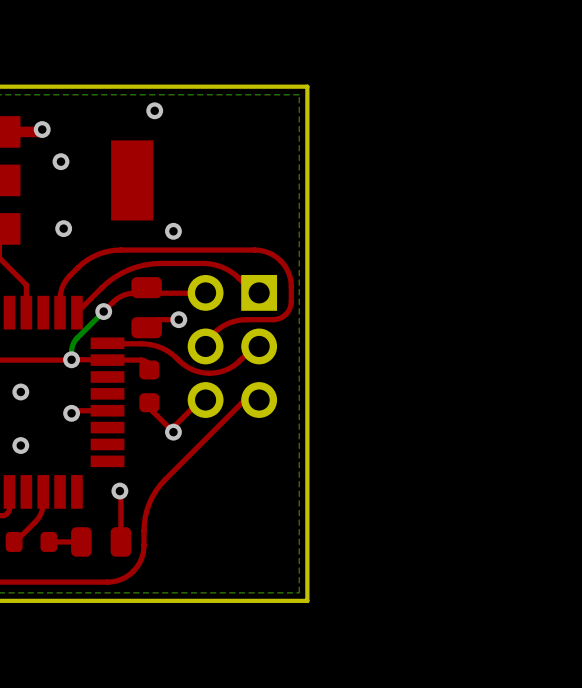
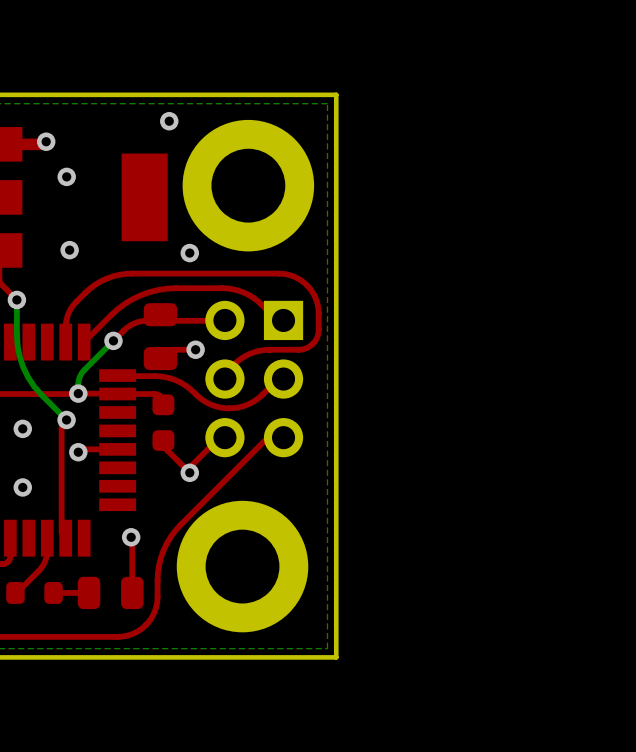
part: none -> (248, 185)
top track: (15, 274) (26, 285) (26, 312) -> none
bottom track: none -> (16, 299) (17, 346) (23, 367) (34, 386) (66, 419)
via: none -> (16, 299)
top track: none -> (66, 419) (61, 428) (61, 531) (63, 536)
via: none -> (66, 419)
part: none -> (242, 566)

